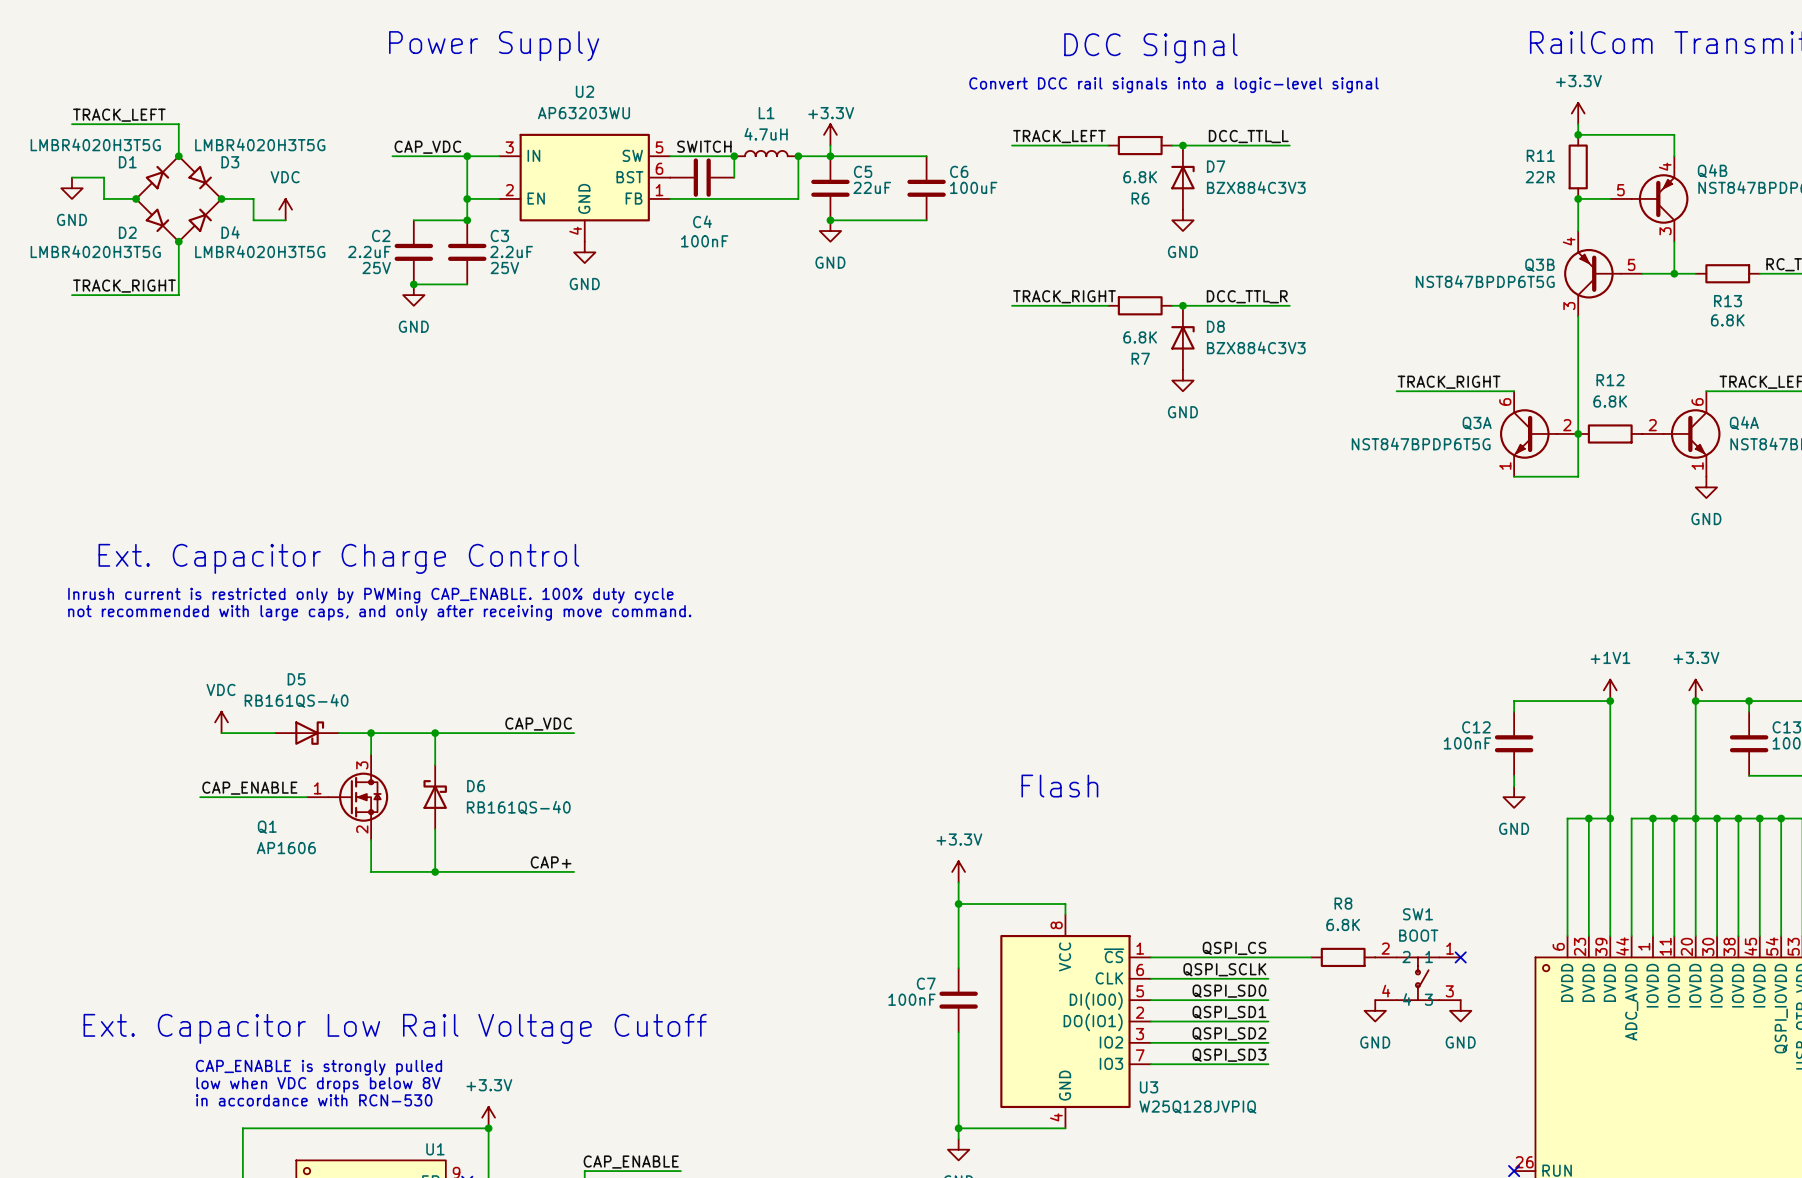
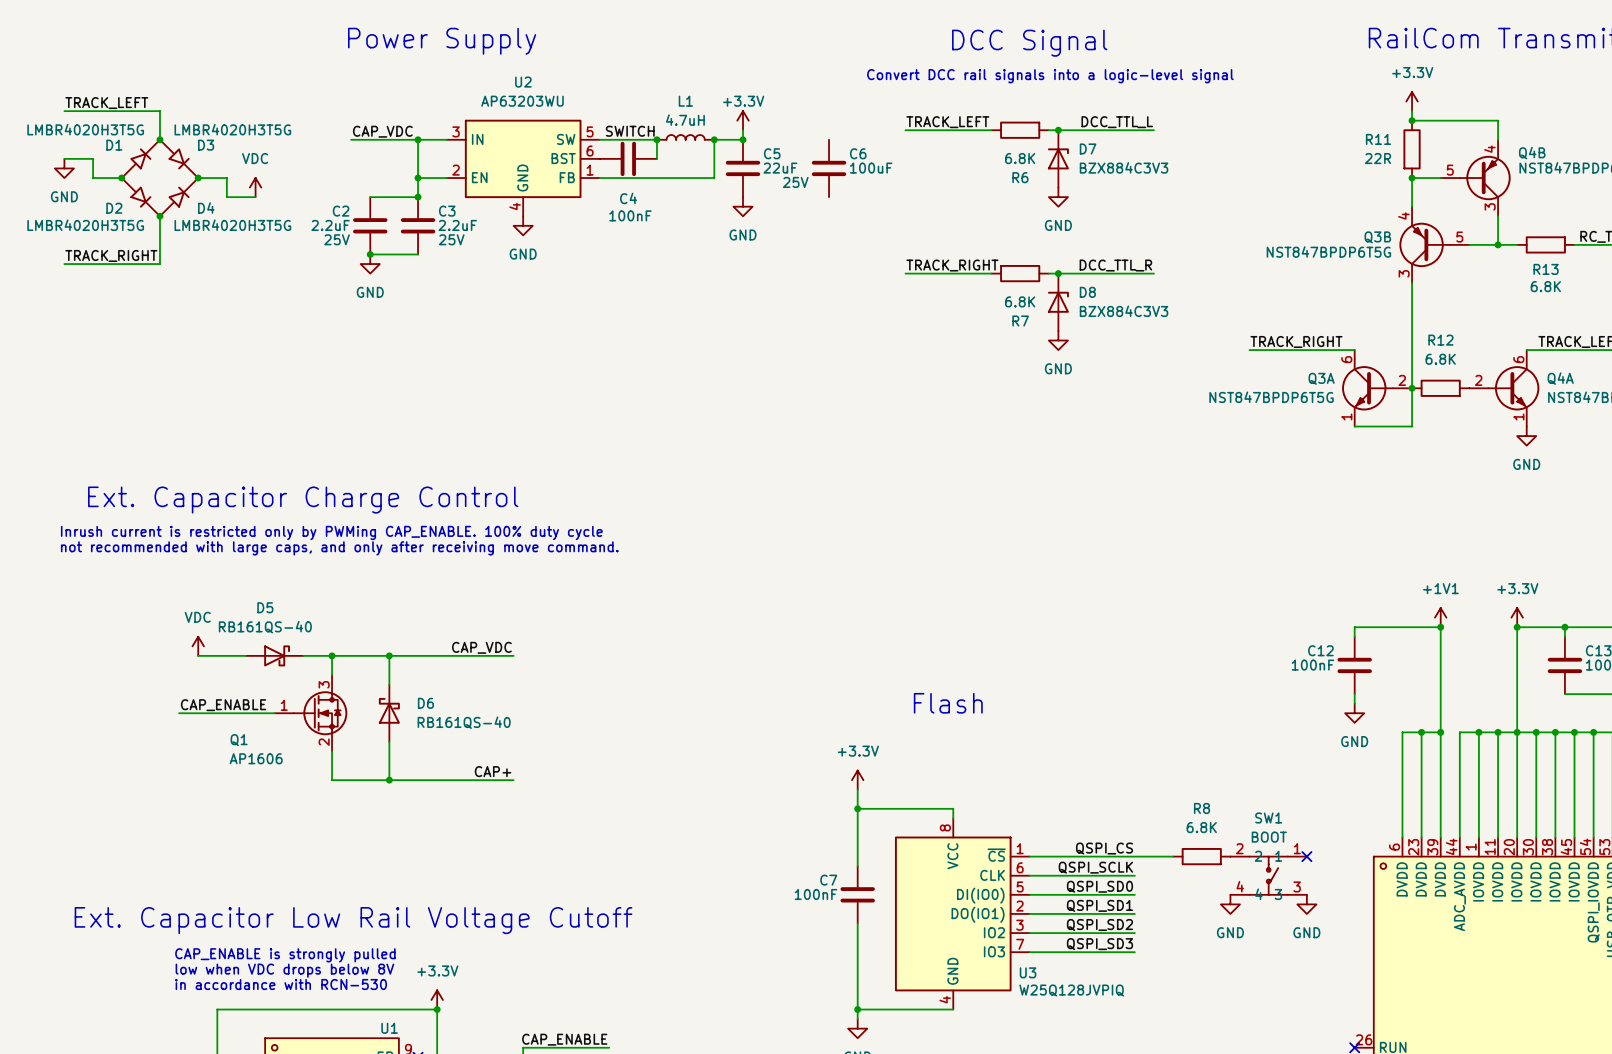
wire: (830, 156) (926, 156) -> none
C6 text: none -> 25V (795, 182)
wire: (830, 220) (926, 220) -> none
junction: (830, 220) -> none

